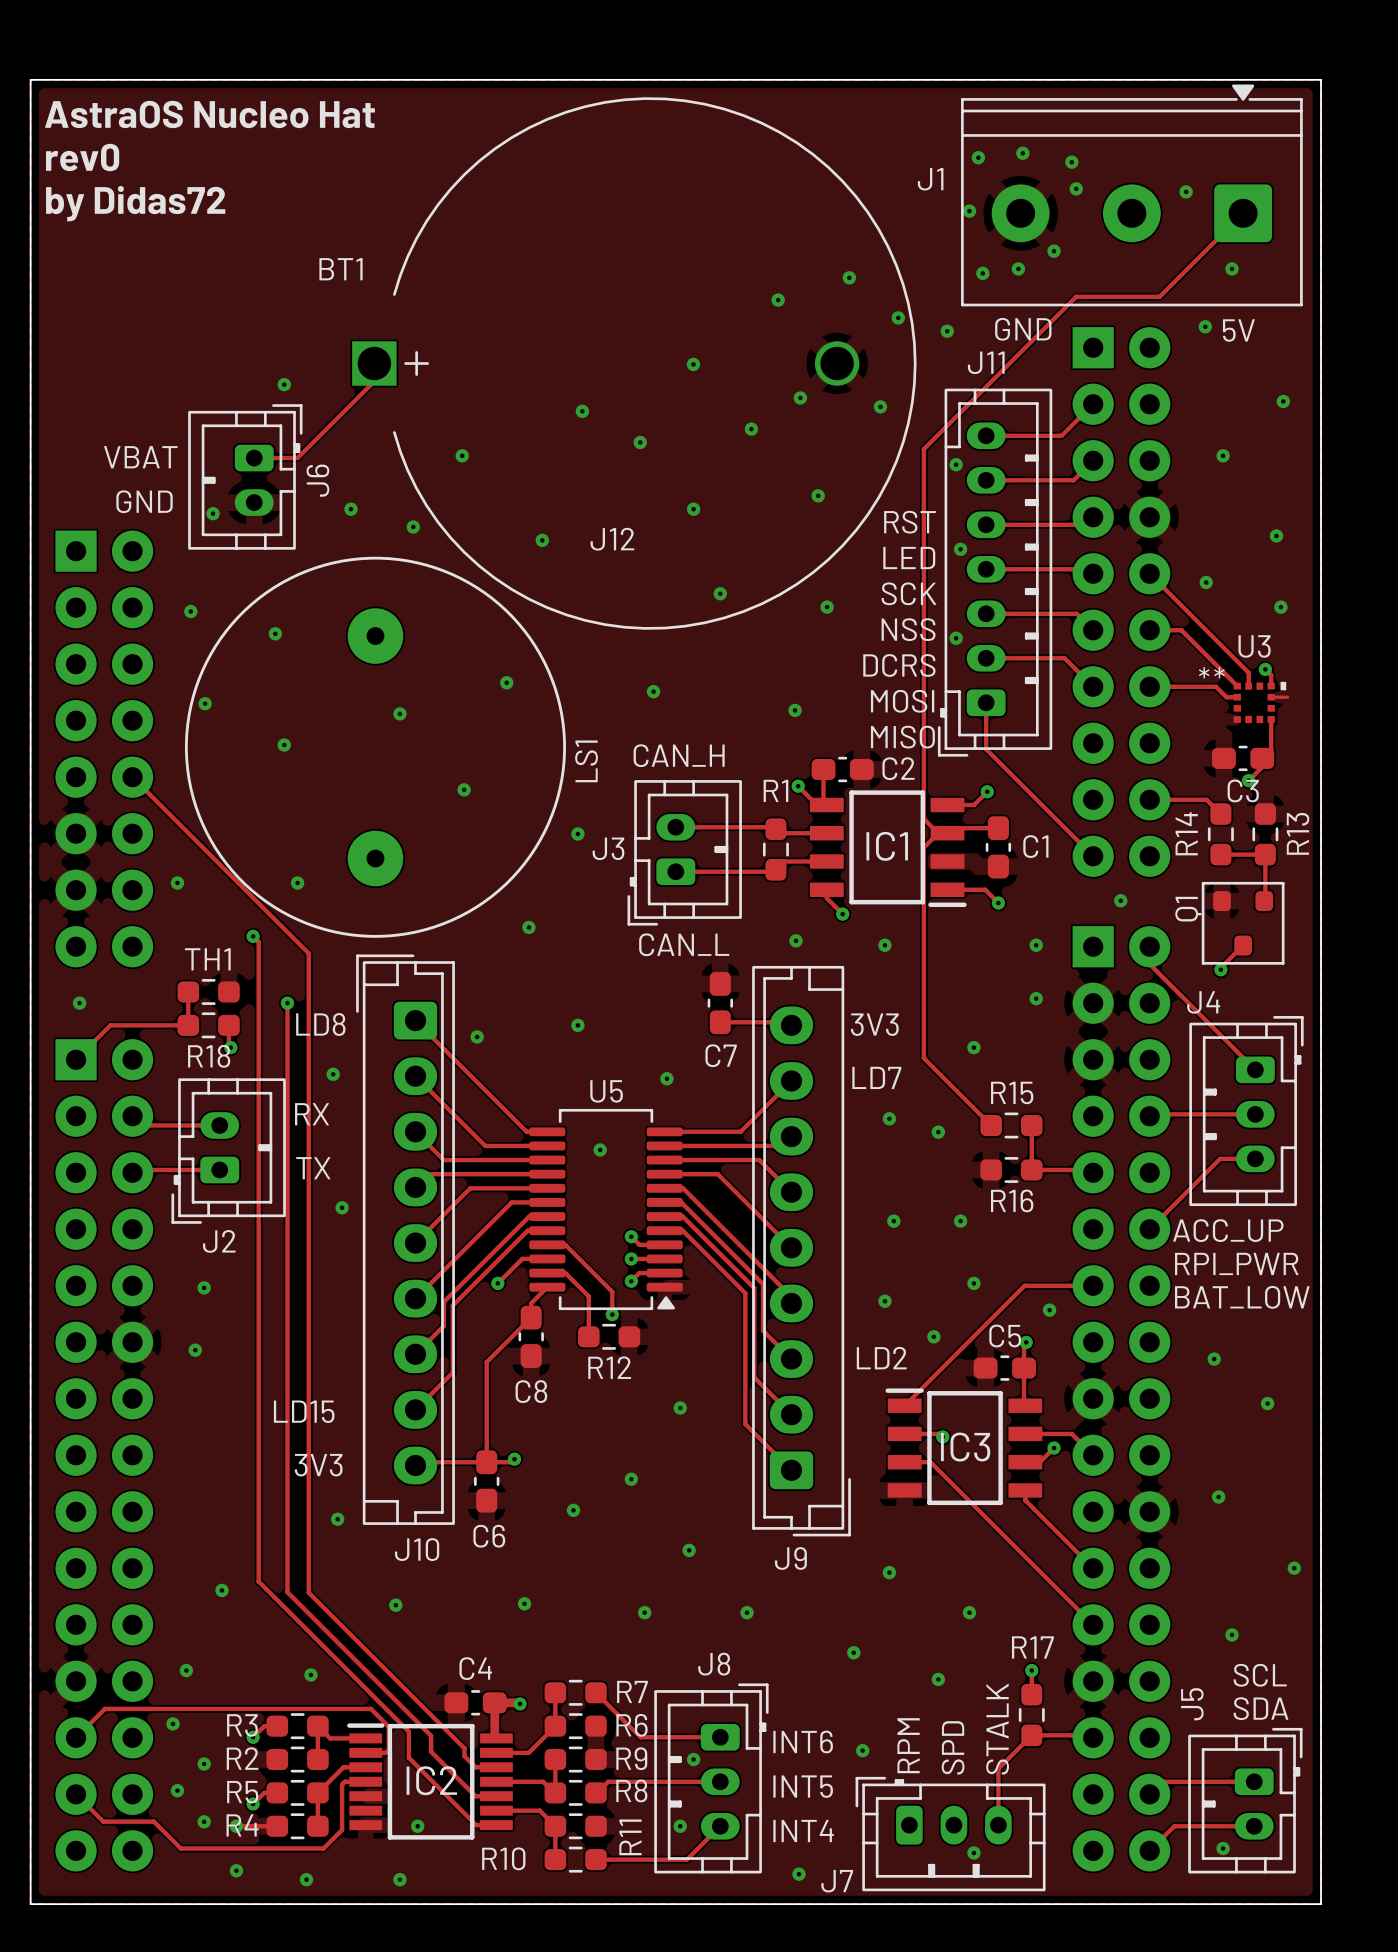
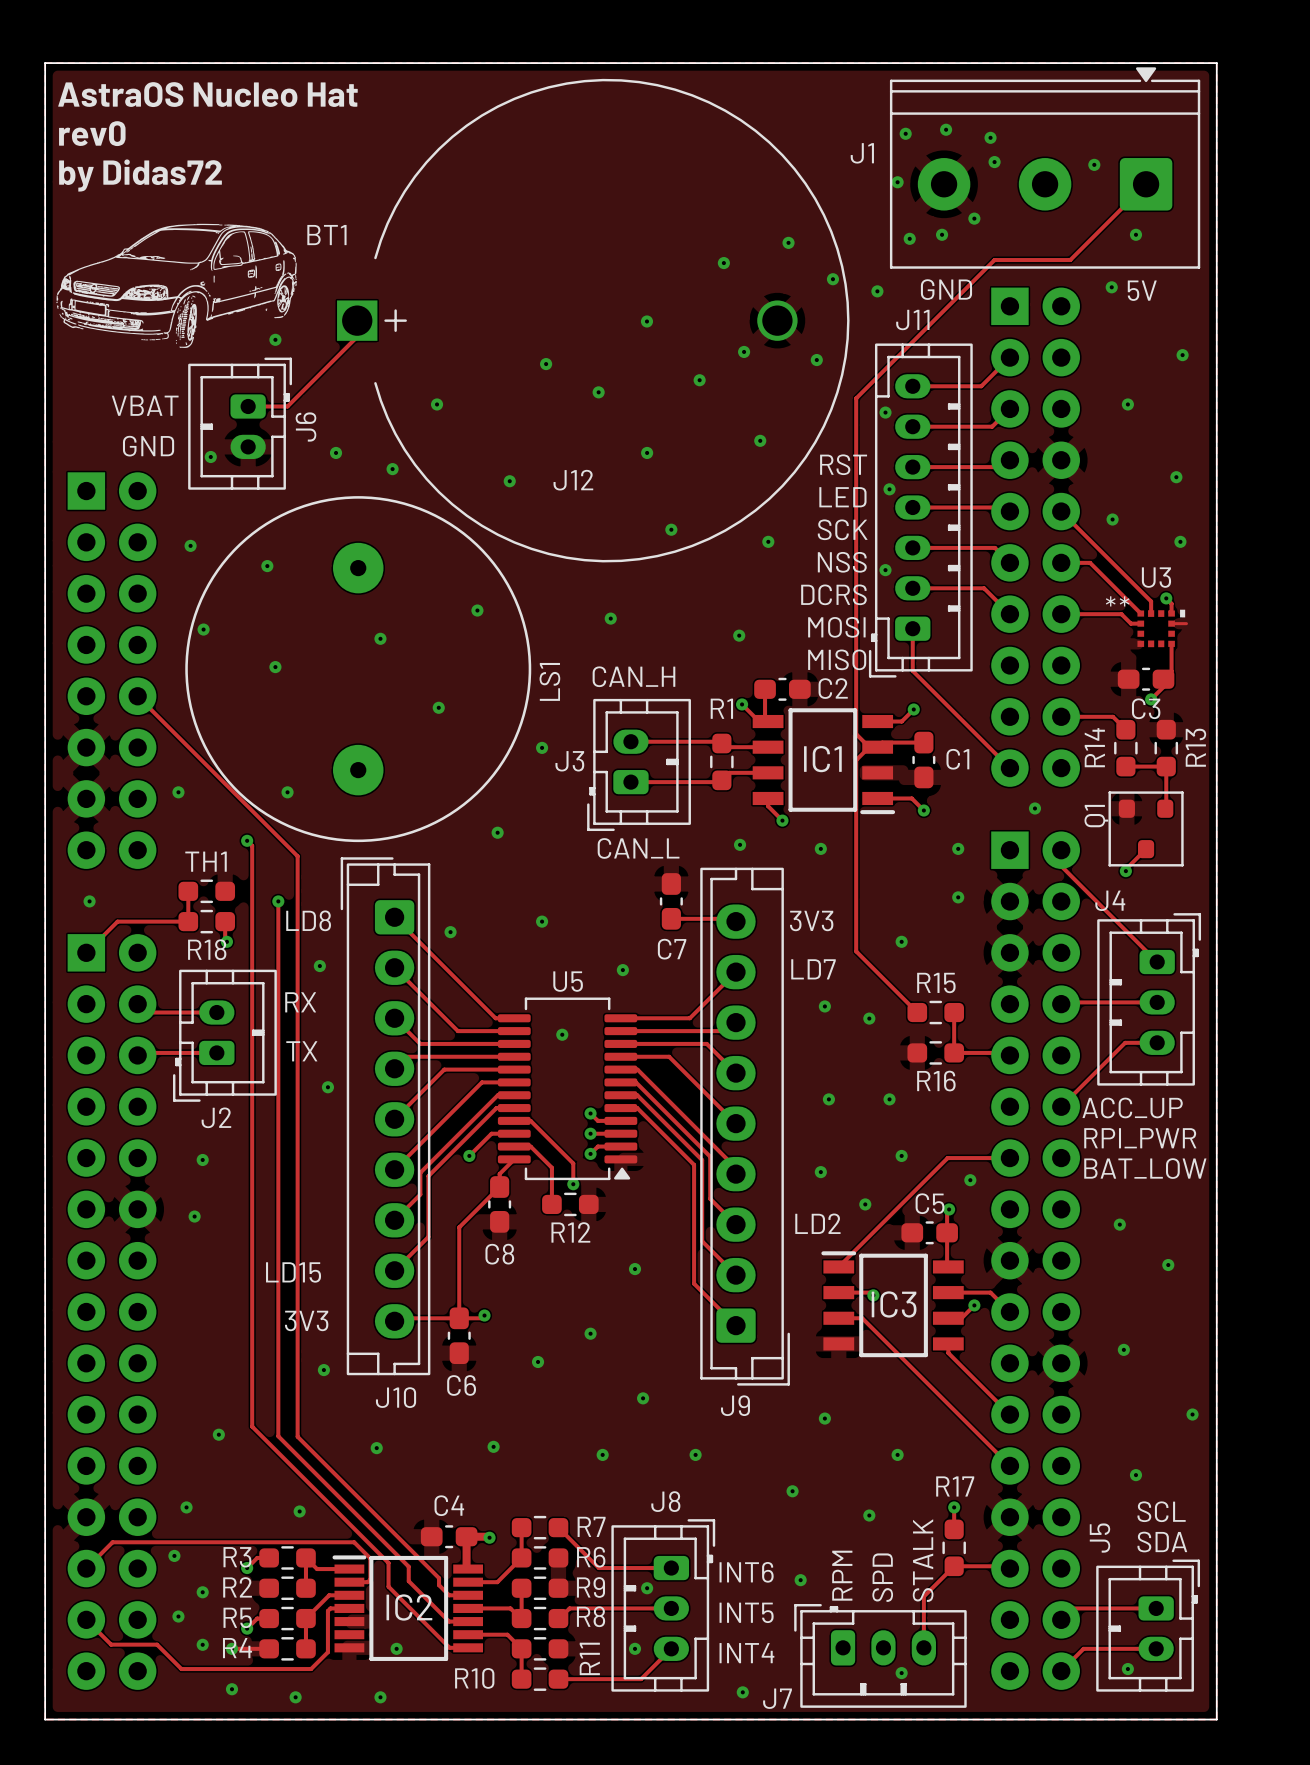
drawing: none -> [56, 223, 297, 348]

